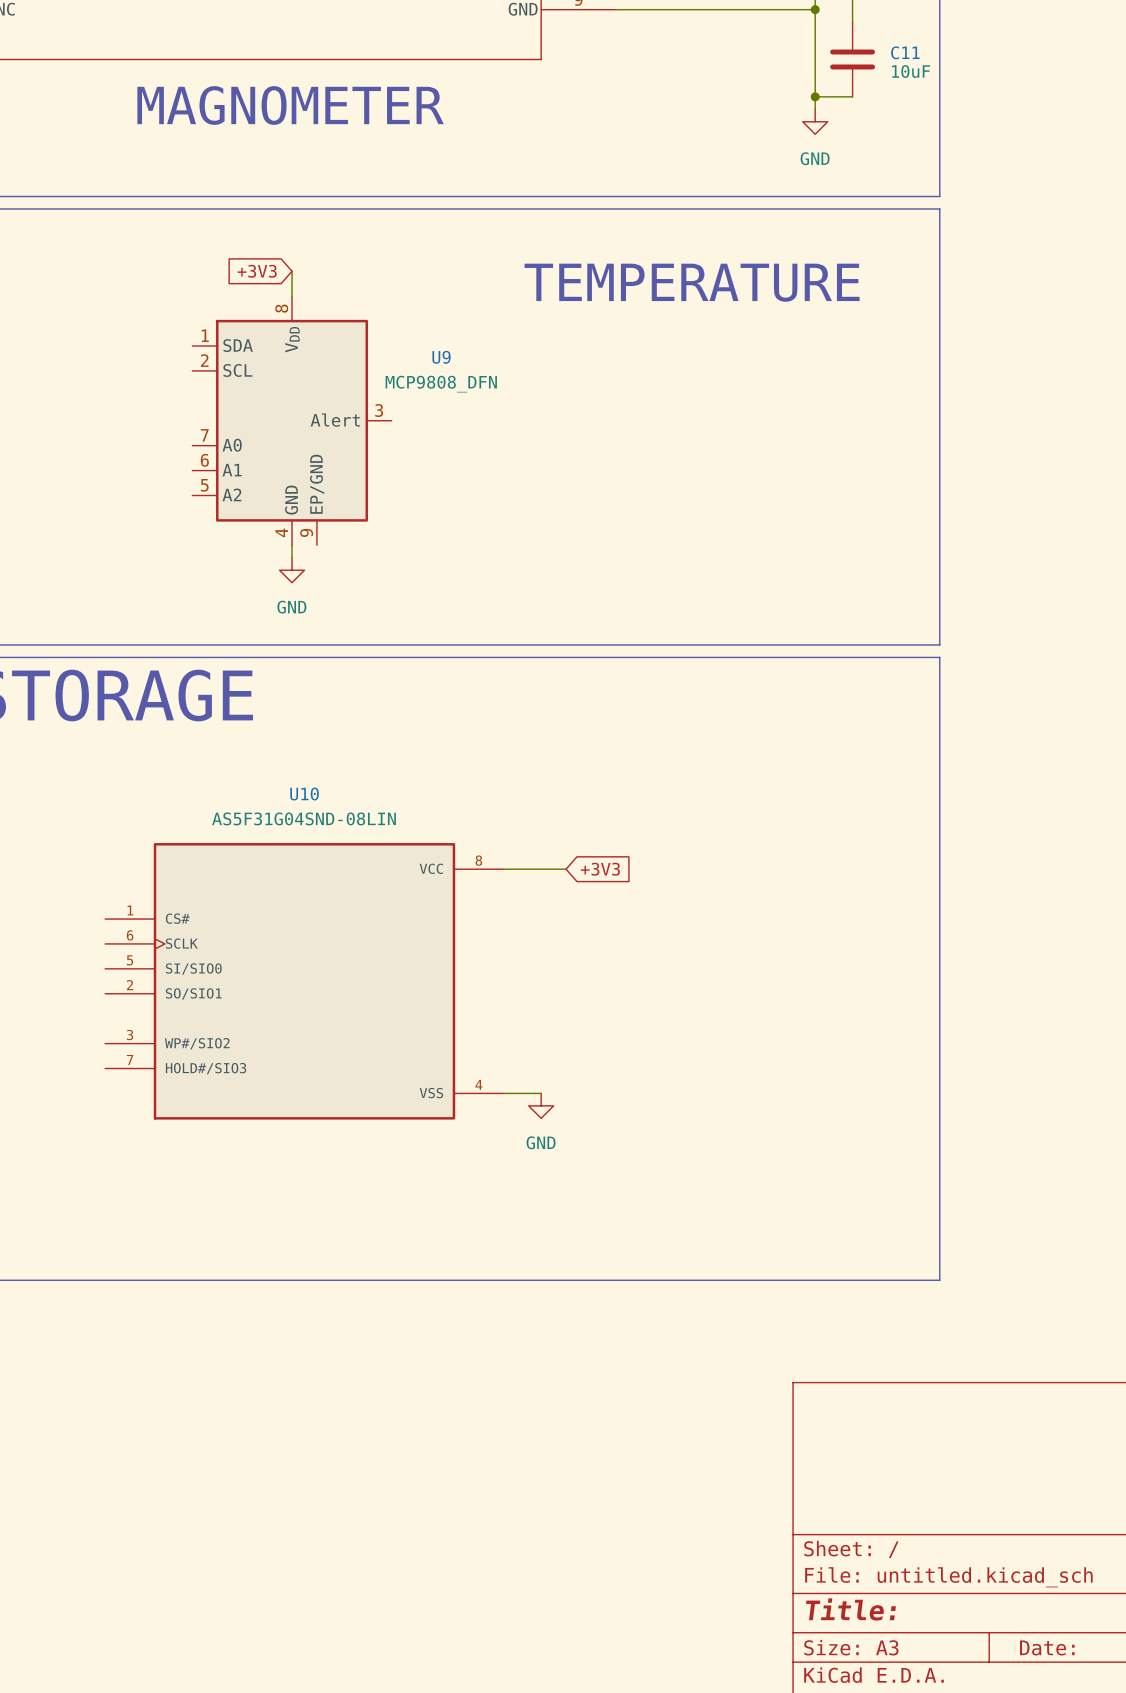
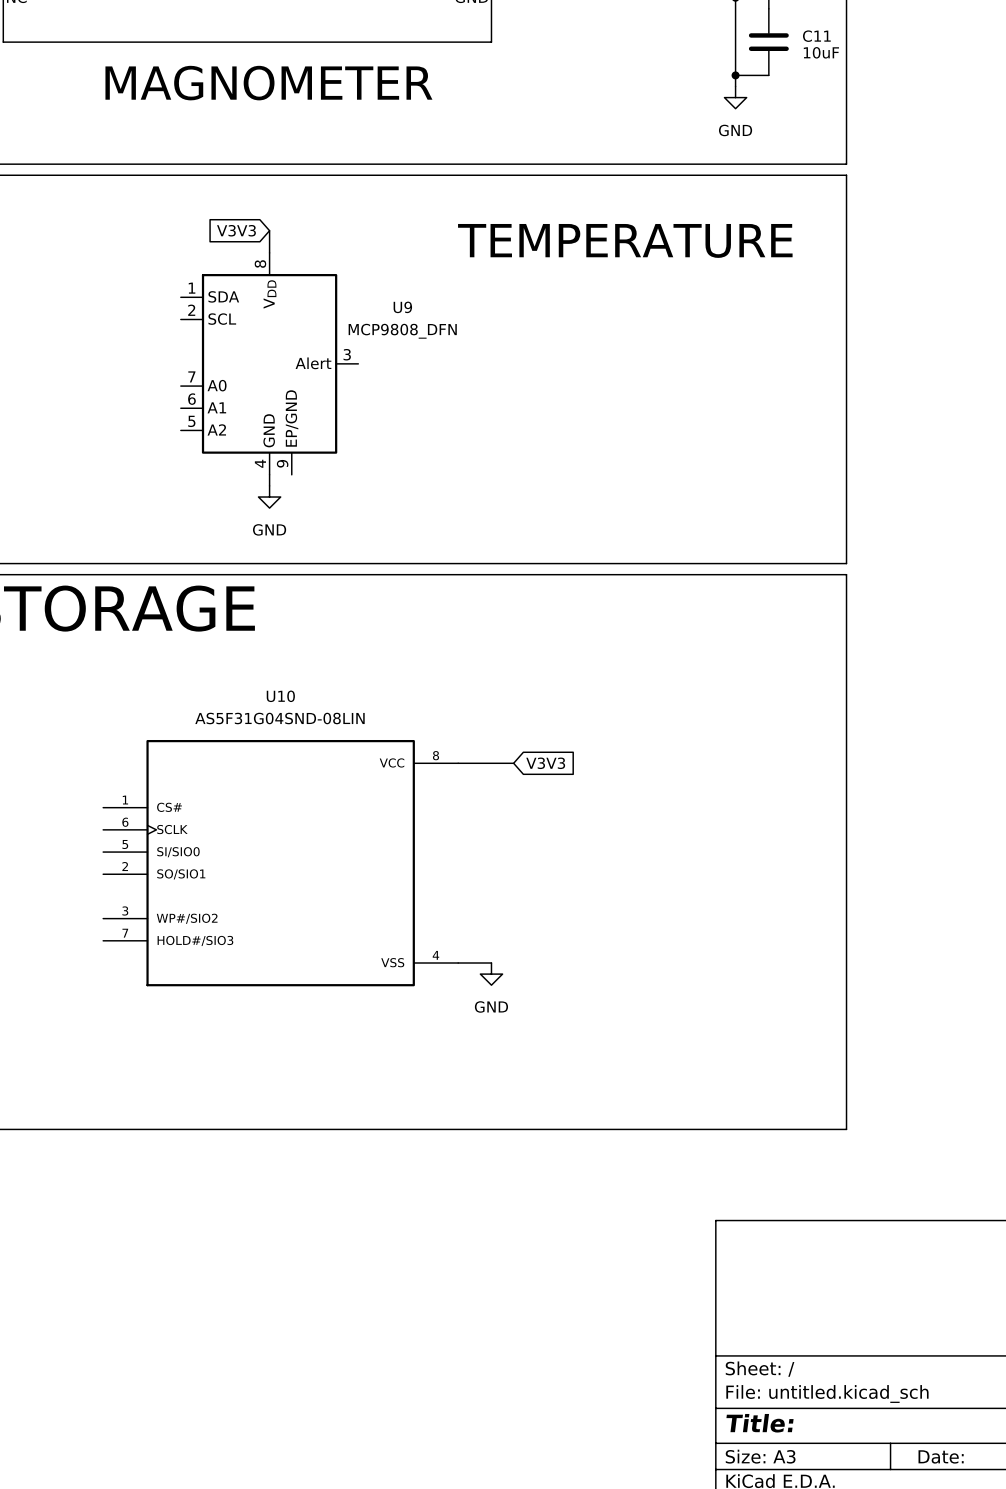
global label: +3V3 (257, 271) -> V3V3 (236, 230)
global label: +3V3 (600, 869) -> V3V3 (545, 763)

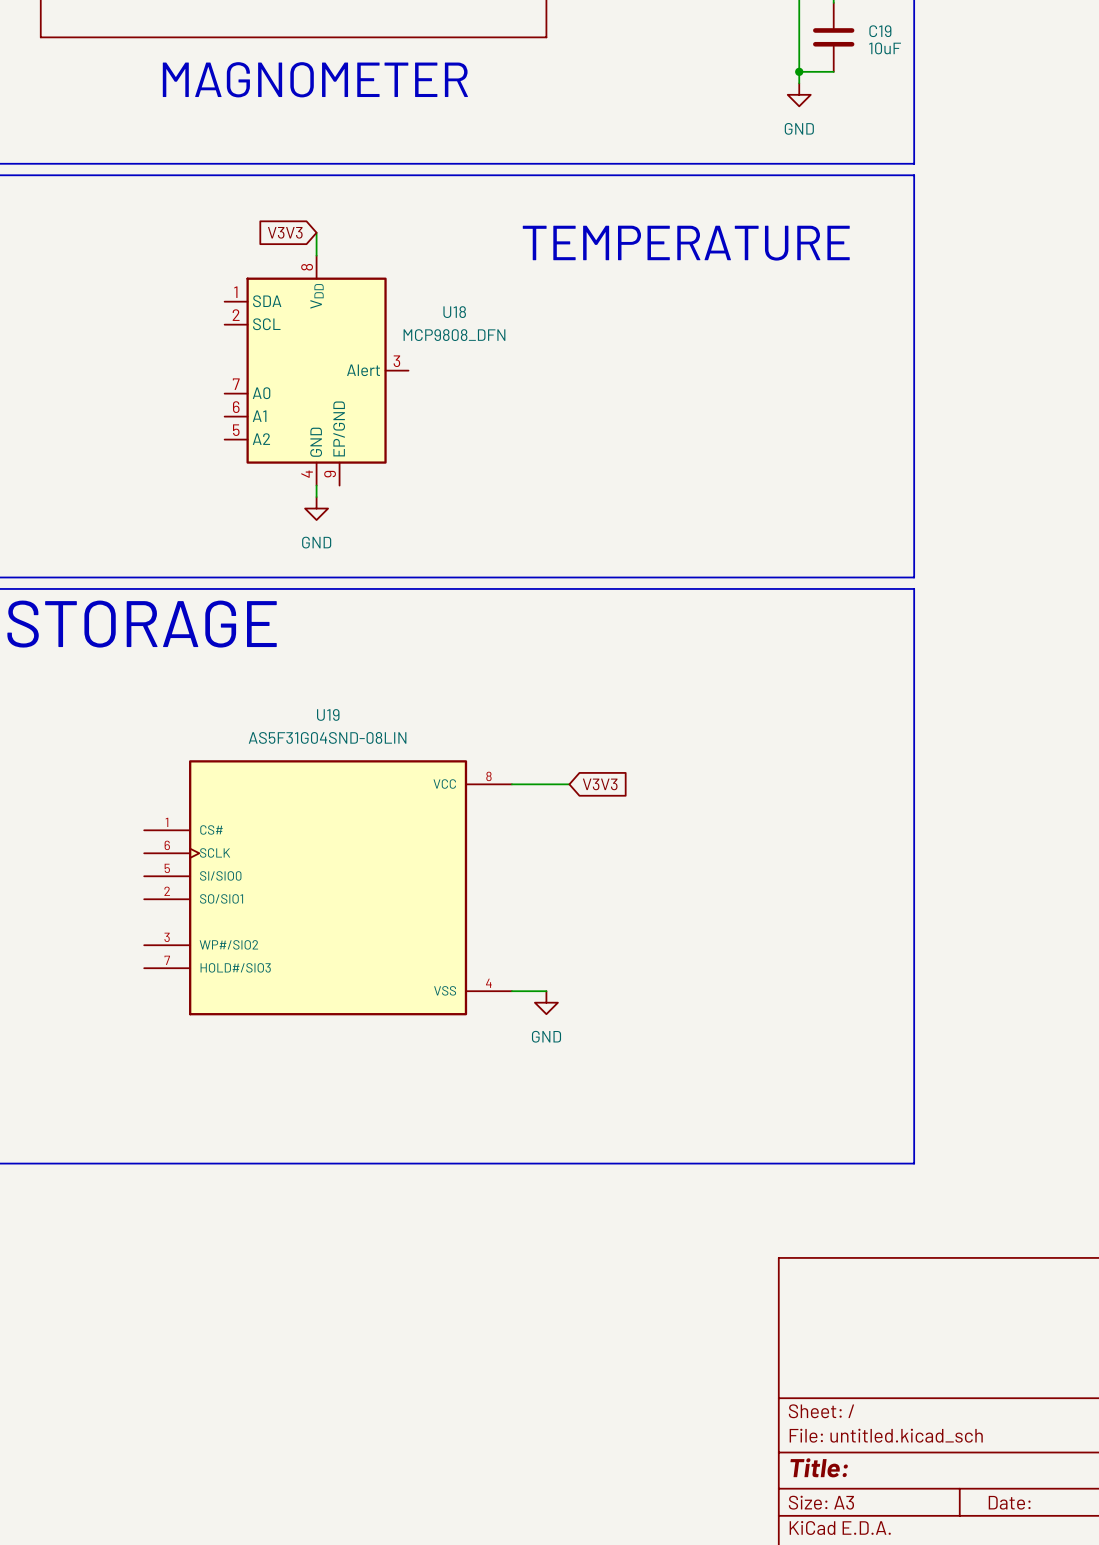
C11 name: C11 (816, 36) -> C19 (880, 31)
U9 name: U9 (402, 307) -> U18 (454, 312)
U10 name: U10 (280, 696) -> U19 (328, 714)

